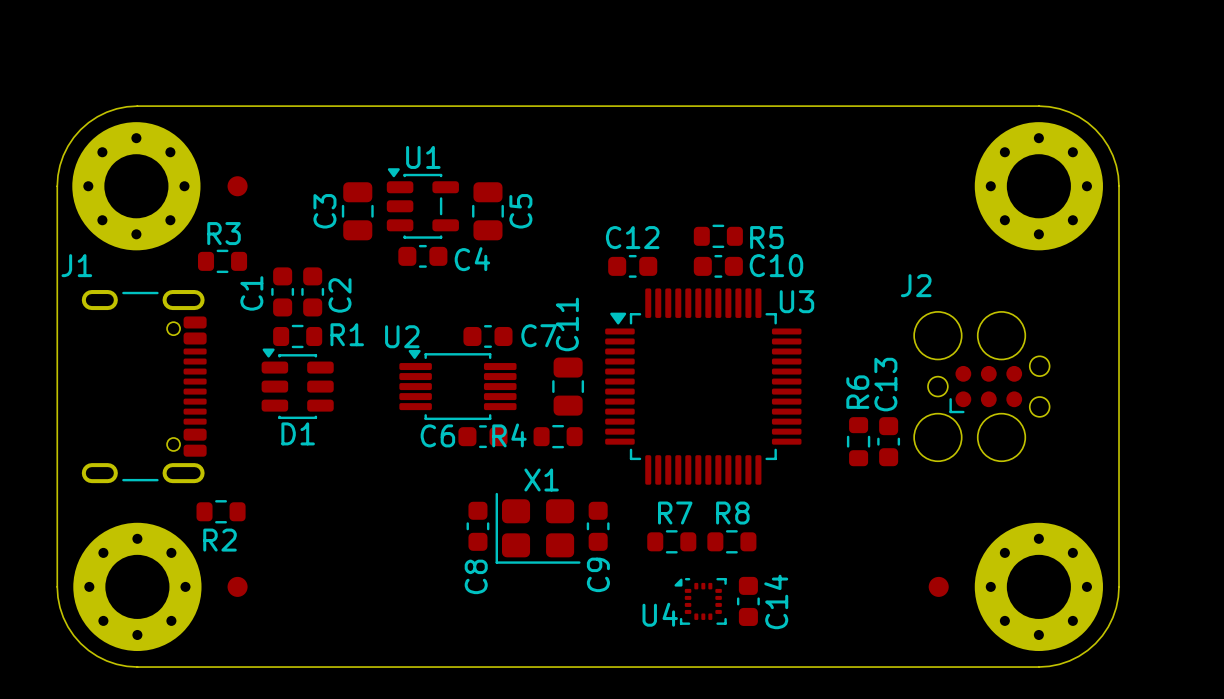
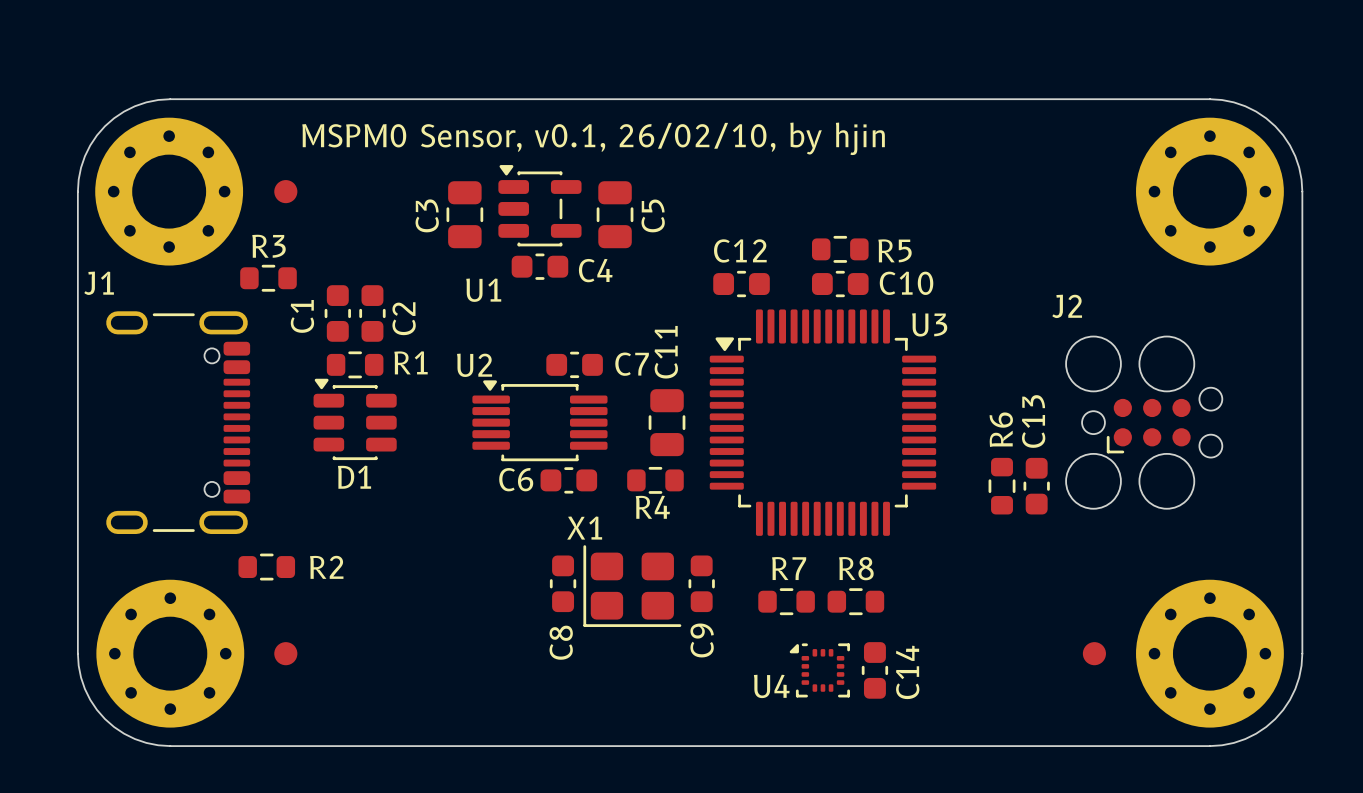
text: none -> MSPM0 Sensor, v0.1, 26/02/10, by hjin (593, 138)
U1 name position: U1 (423, 157) -> U1 (483, 290)
U1 position: (422, 203) -> (539, 205)
C3 position: (357, 211) -> (464, 214)
C5 position: (487, 211) -> (615, 214)
C4 position: (422, 256) -> (539, 266)
R4 name position: R4 (509, 435) -> R4 (652, 507)
X1 name position: X1 (541, 479) -> X1 (584, 528)
R2 name position: R2 (220, 540) -> R2 (326, 567)

